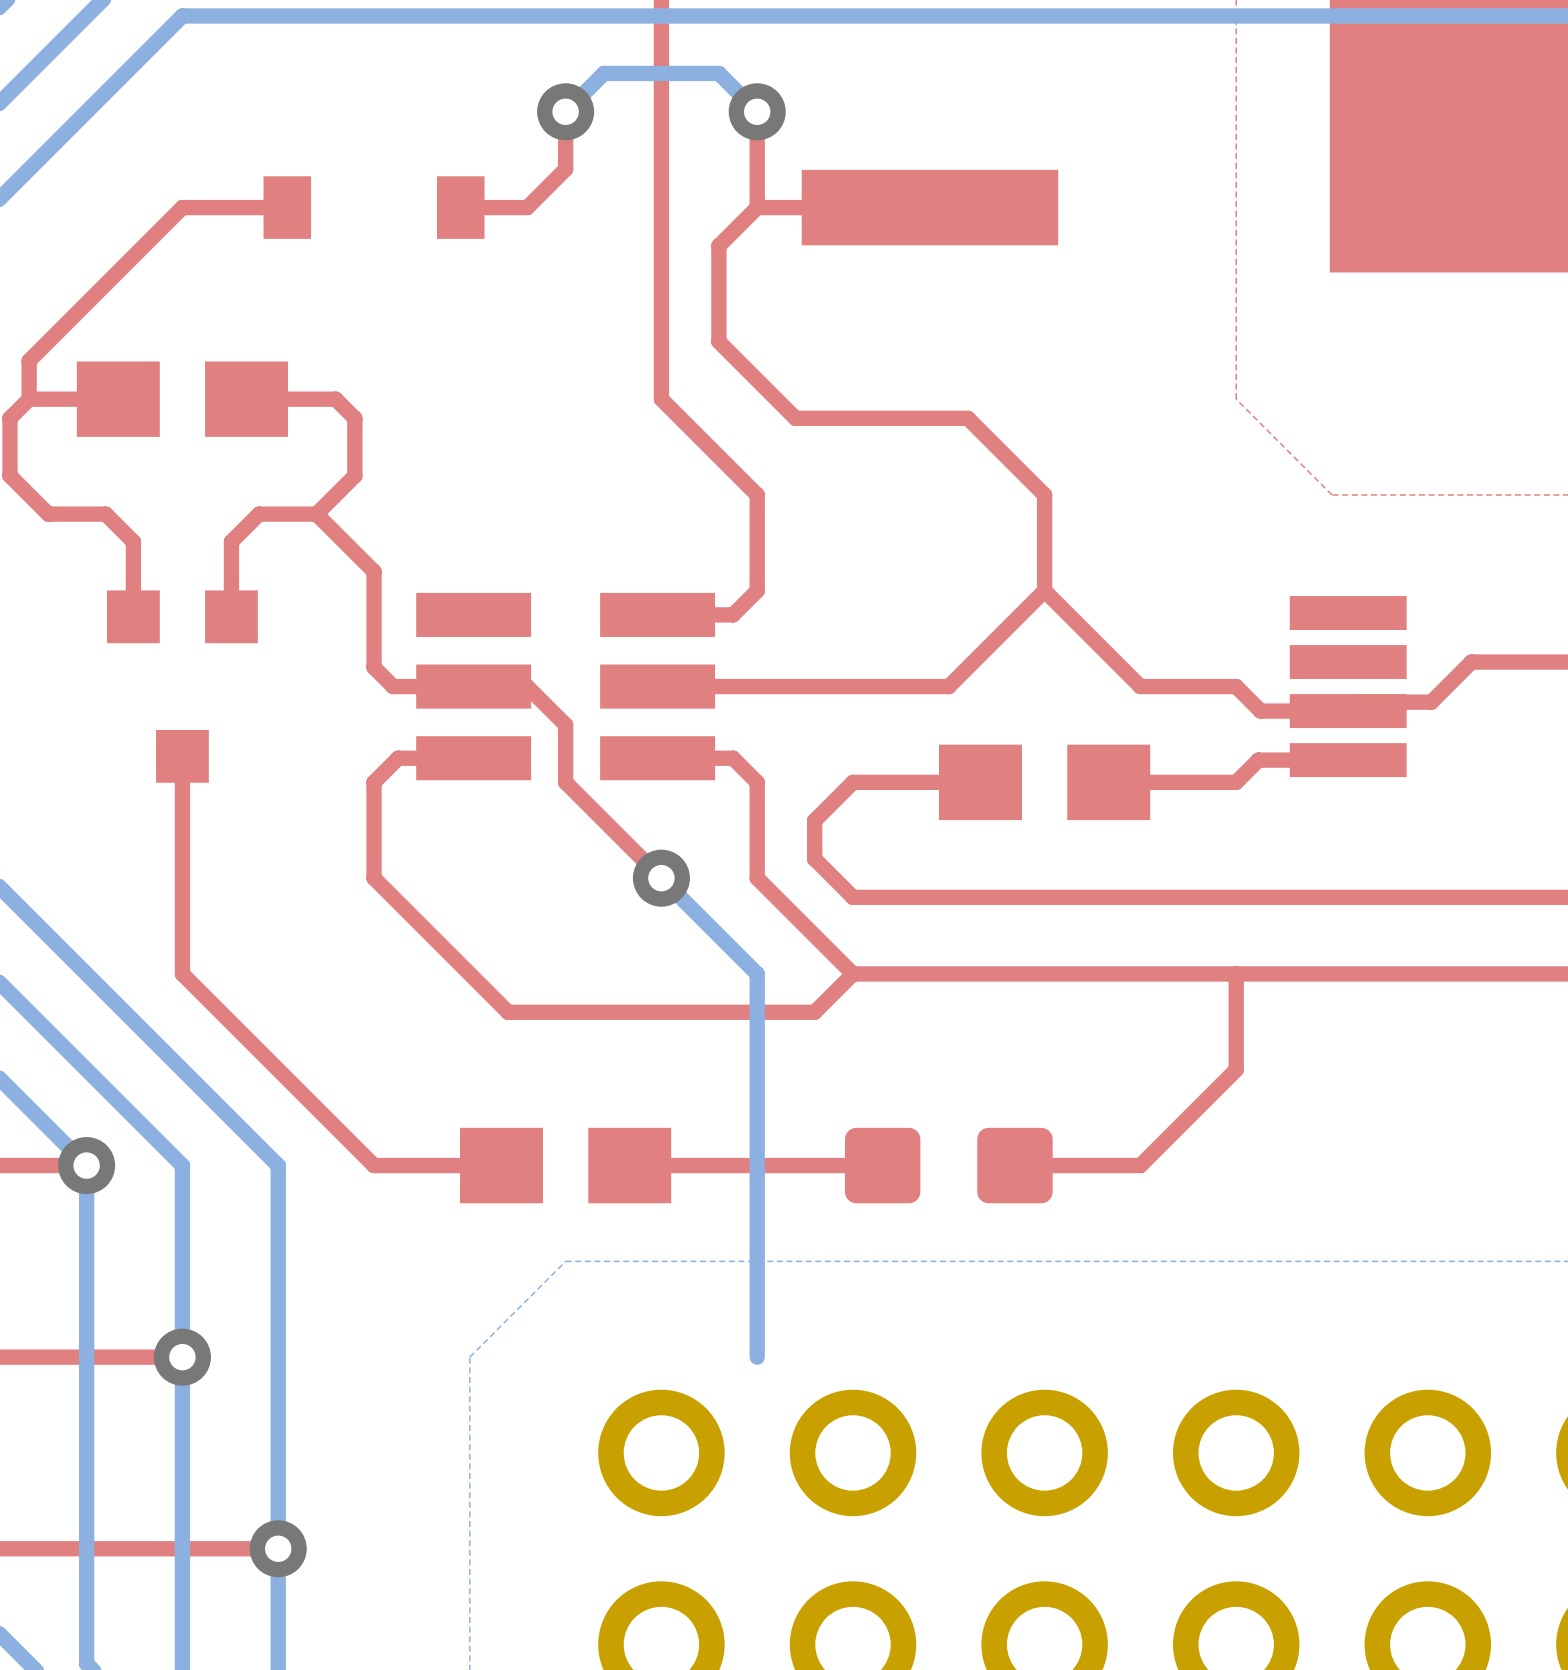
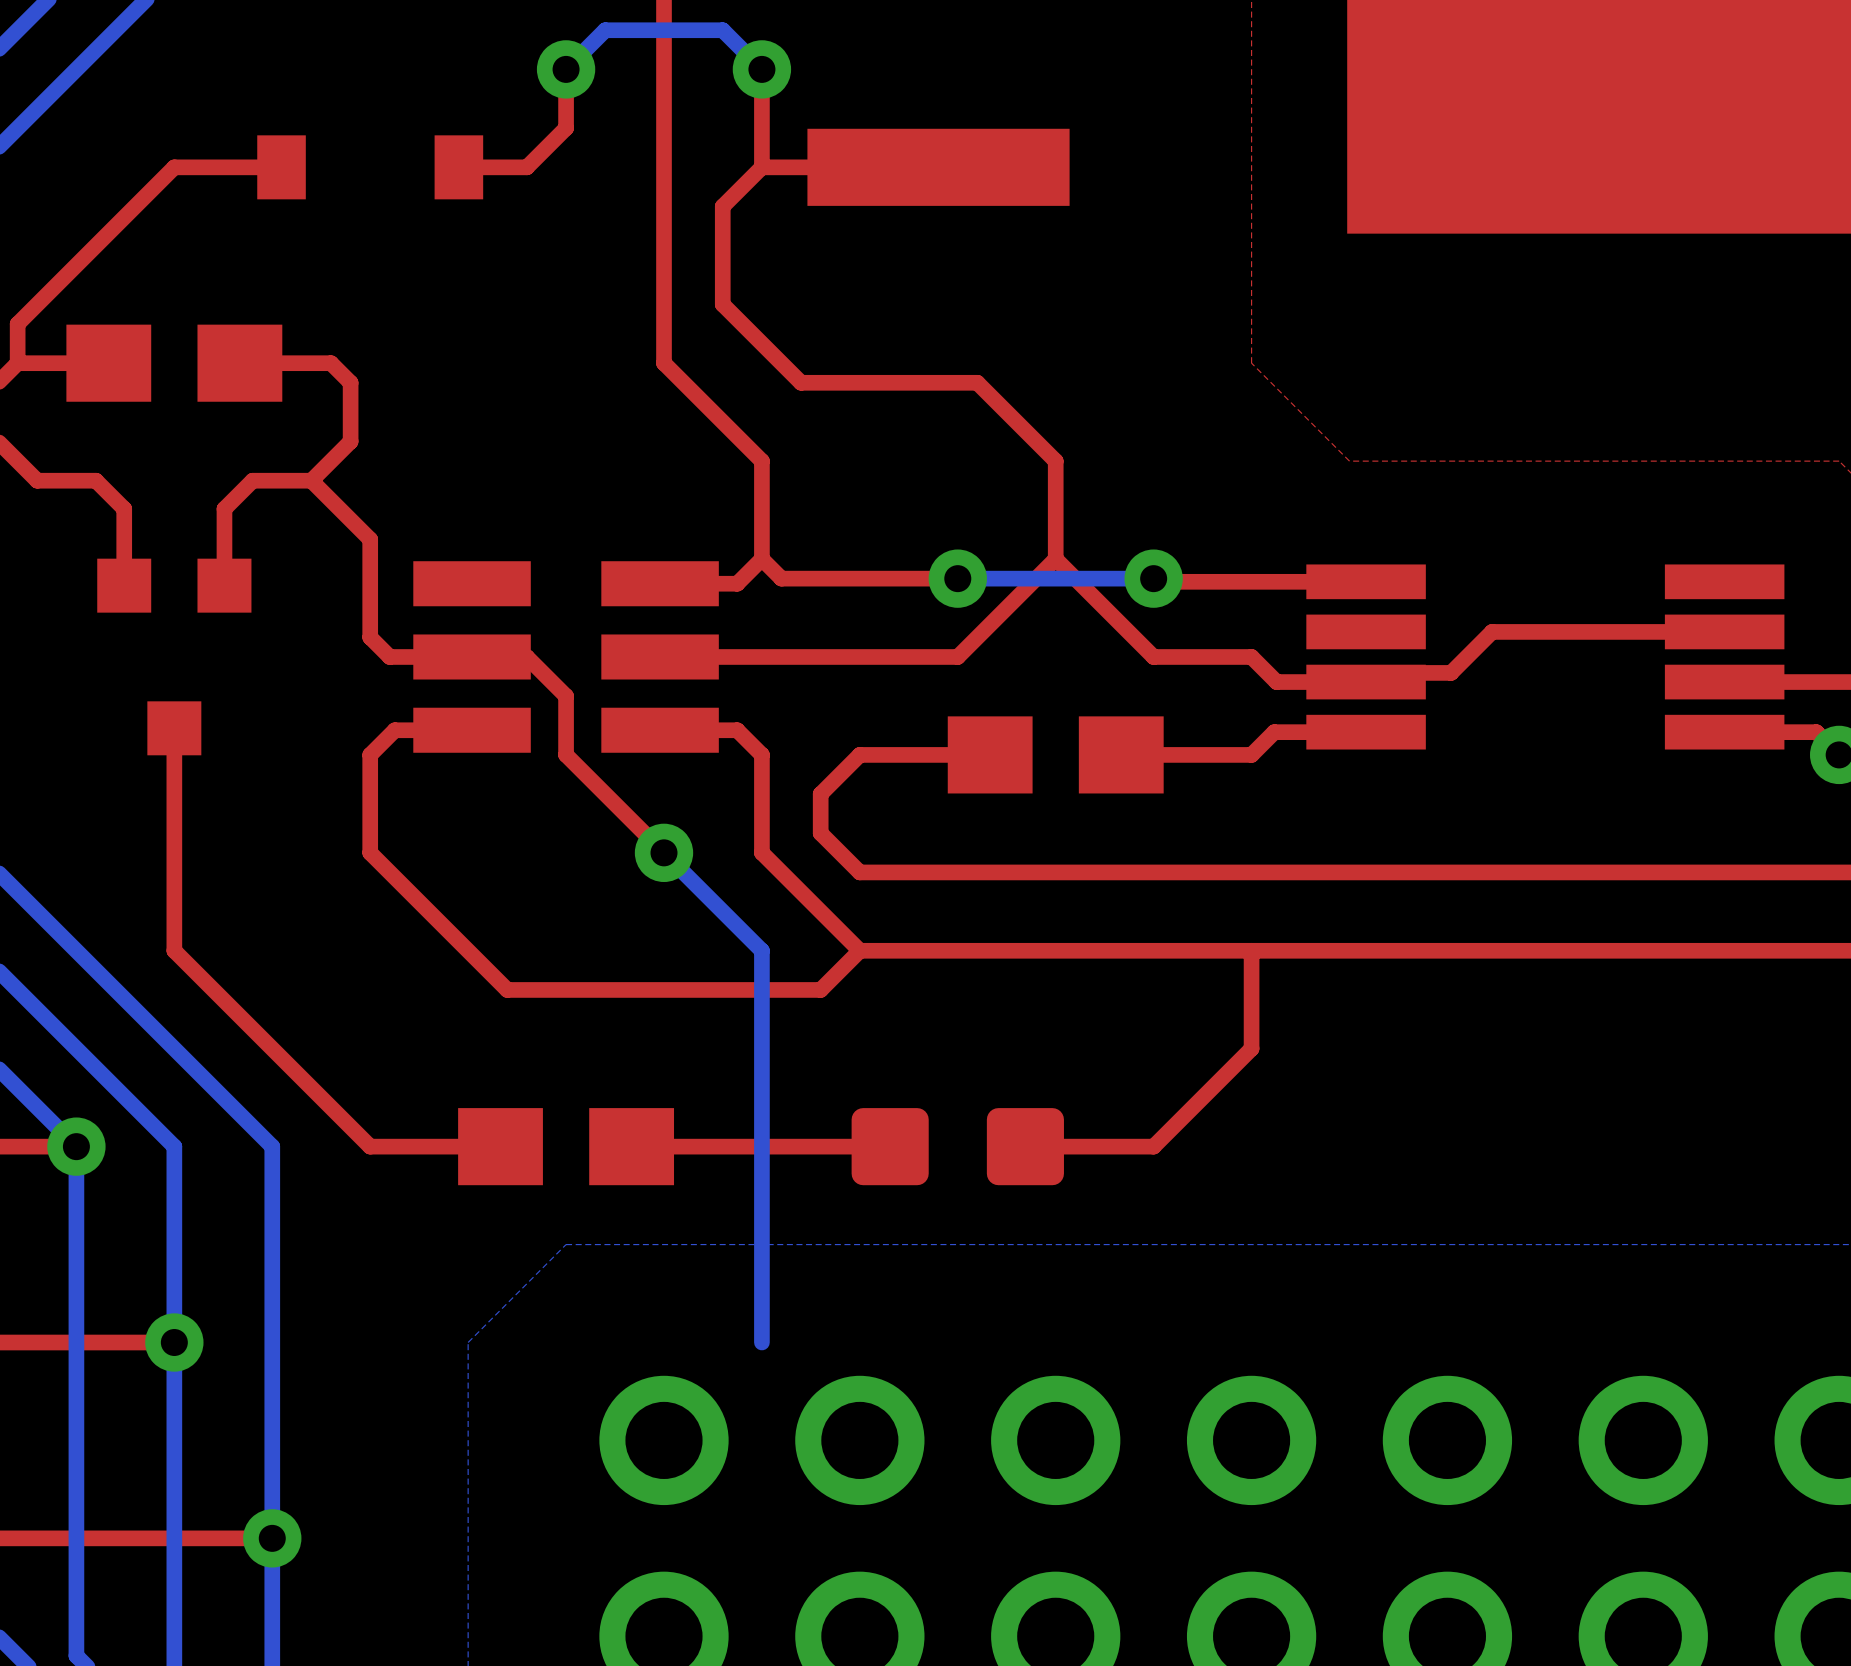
top track: none -> (761, 559) (781, 578) (957, 578)
via: none -> (957, 578)
top track: none -> (1153, 578) (1156, 581) (1366, 581)
bottom track: none -> (1153, 578) (957, 578)
via: none -> (1153, 578)

